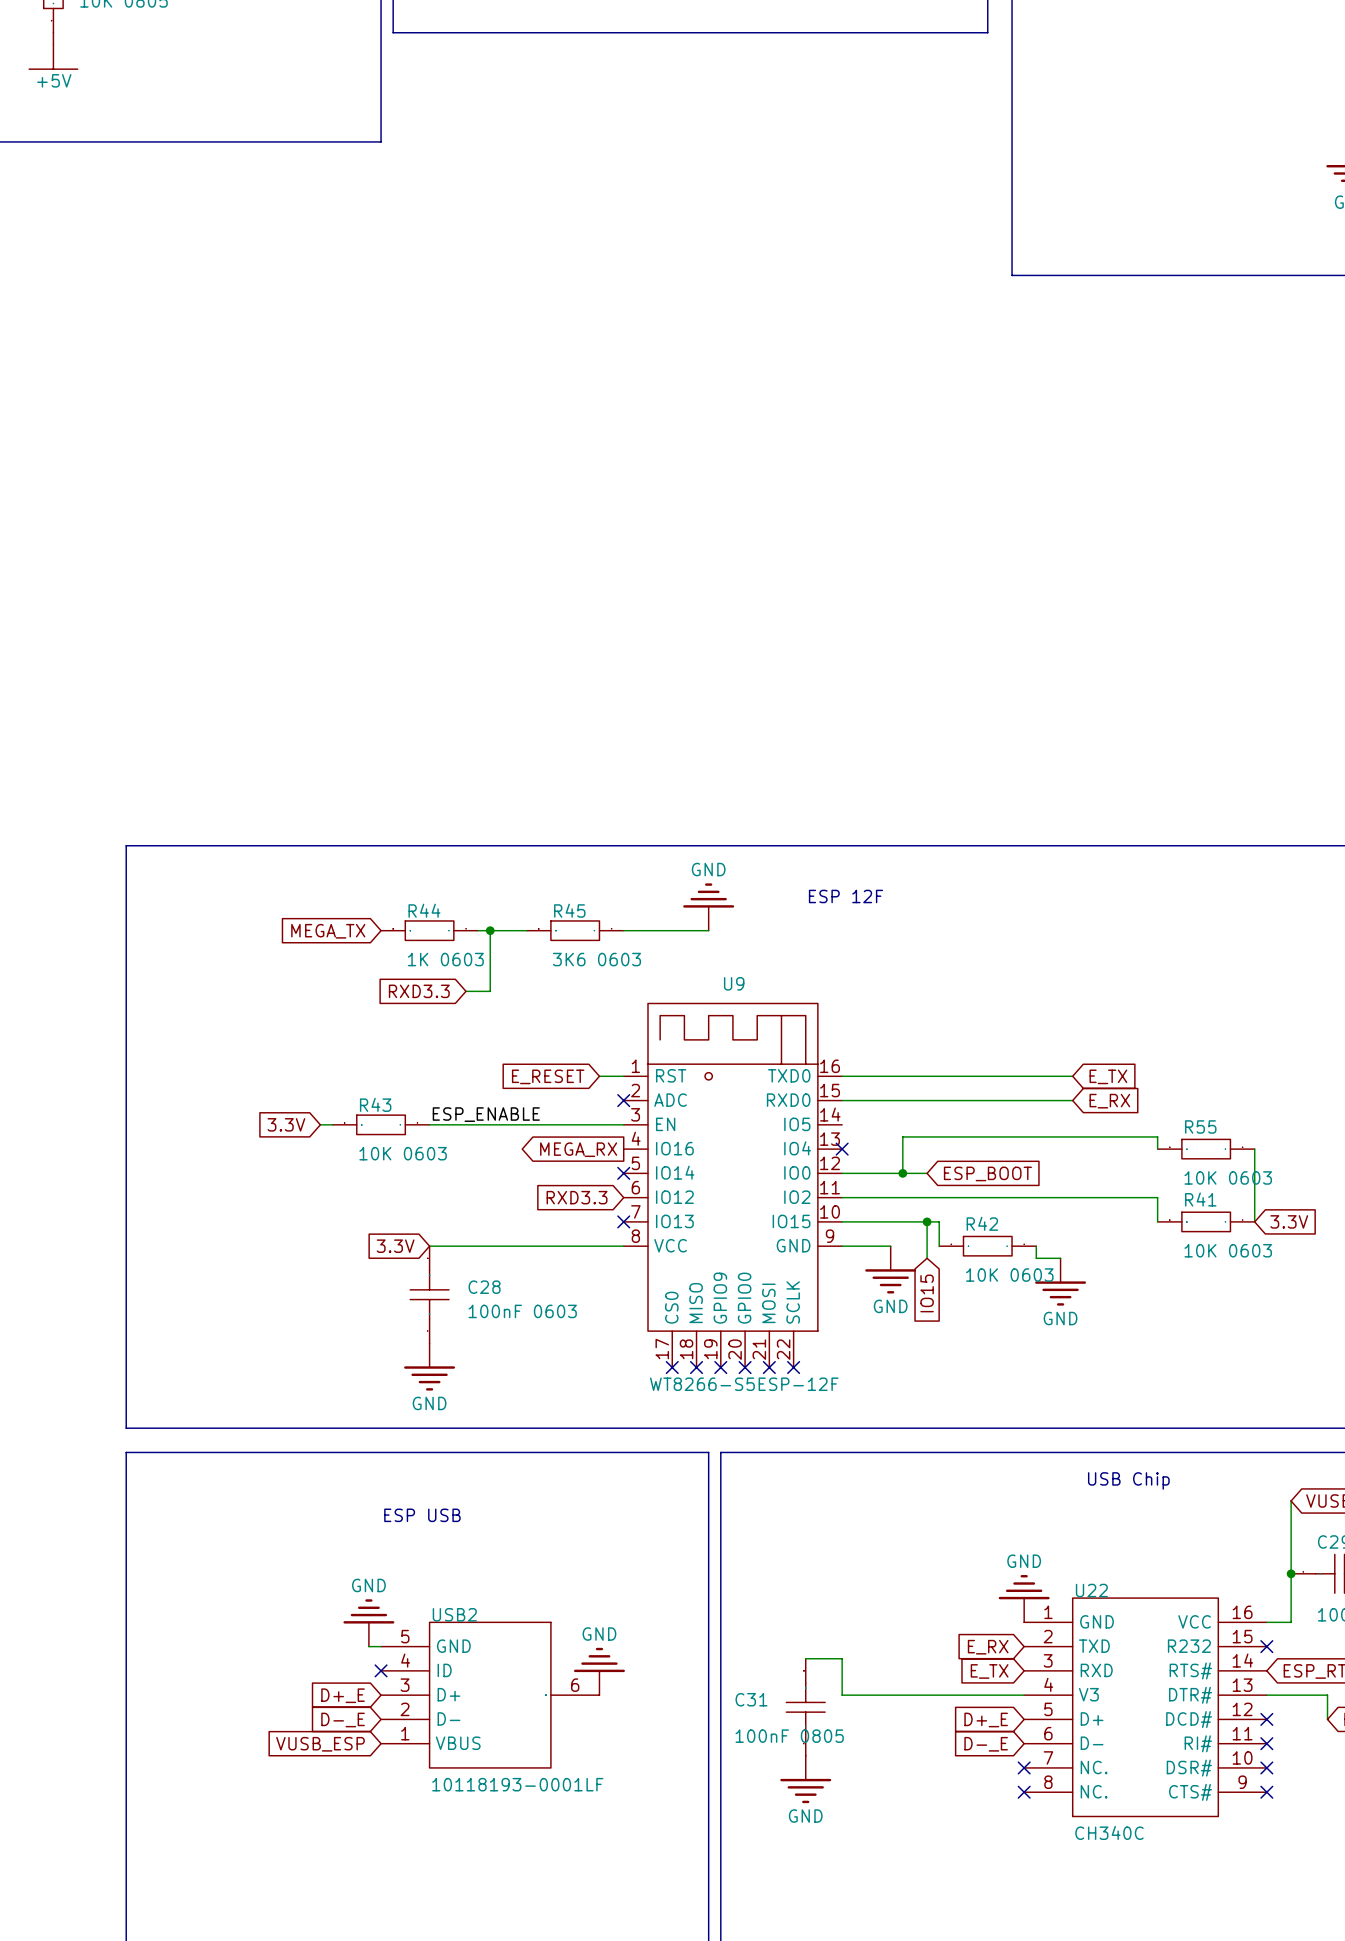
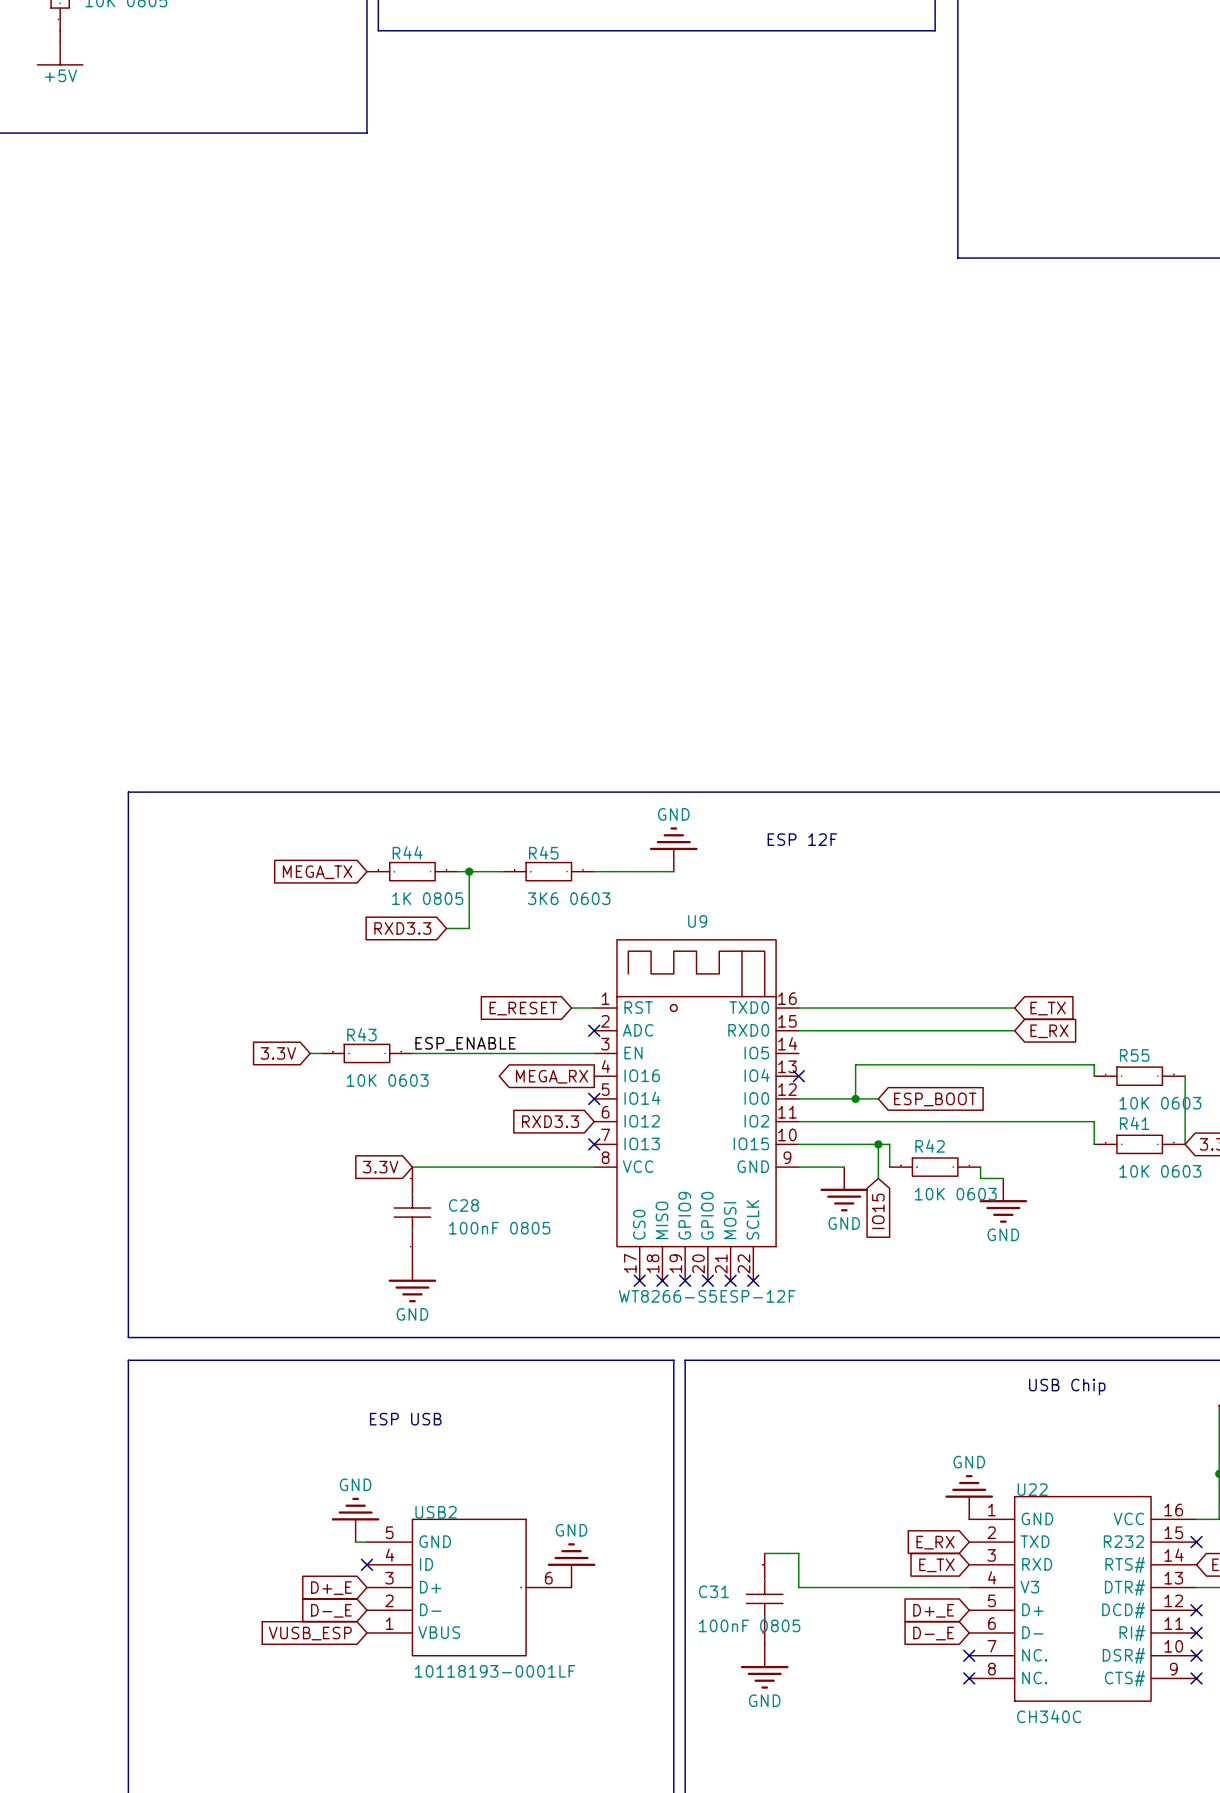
R44 value: 1K 0603 (445, 959) -> 1K 0805 (427, 898)
C28 value: 100nF 0603 (522, 1311) -> 100nF 0805 (499, 1228)

